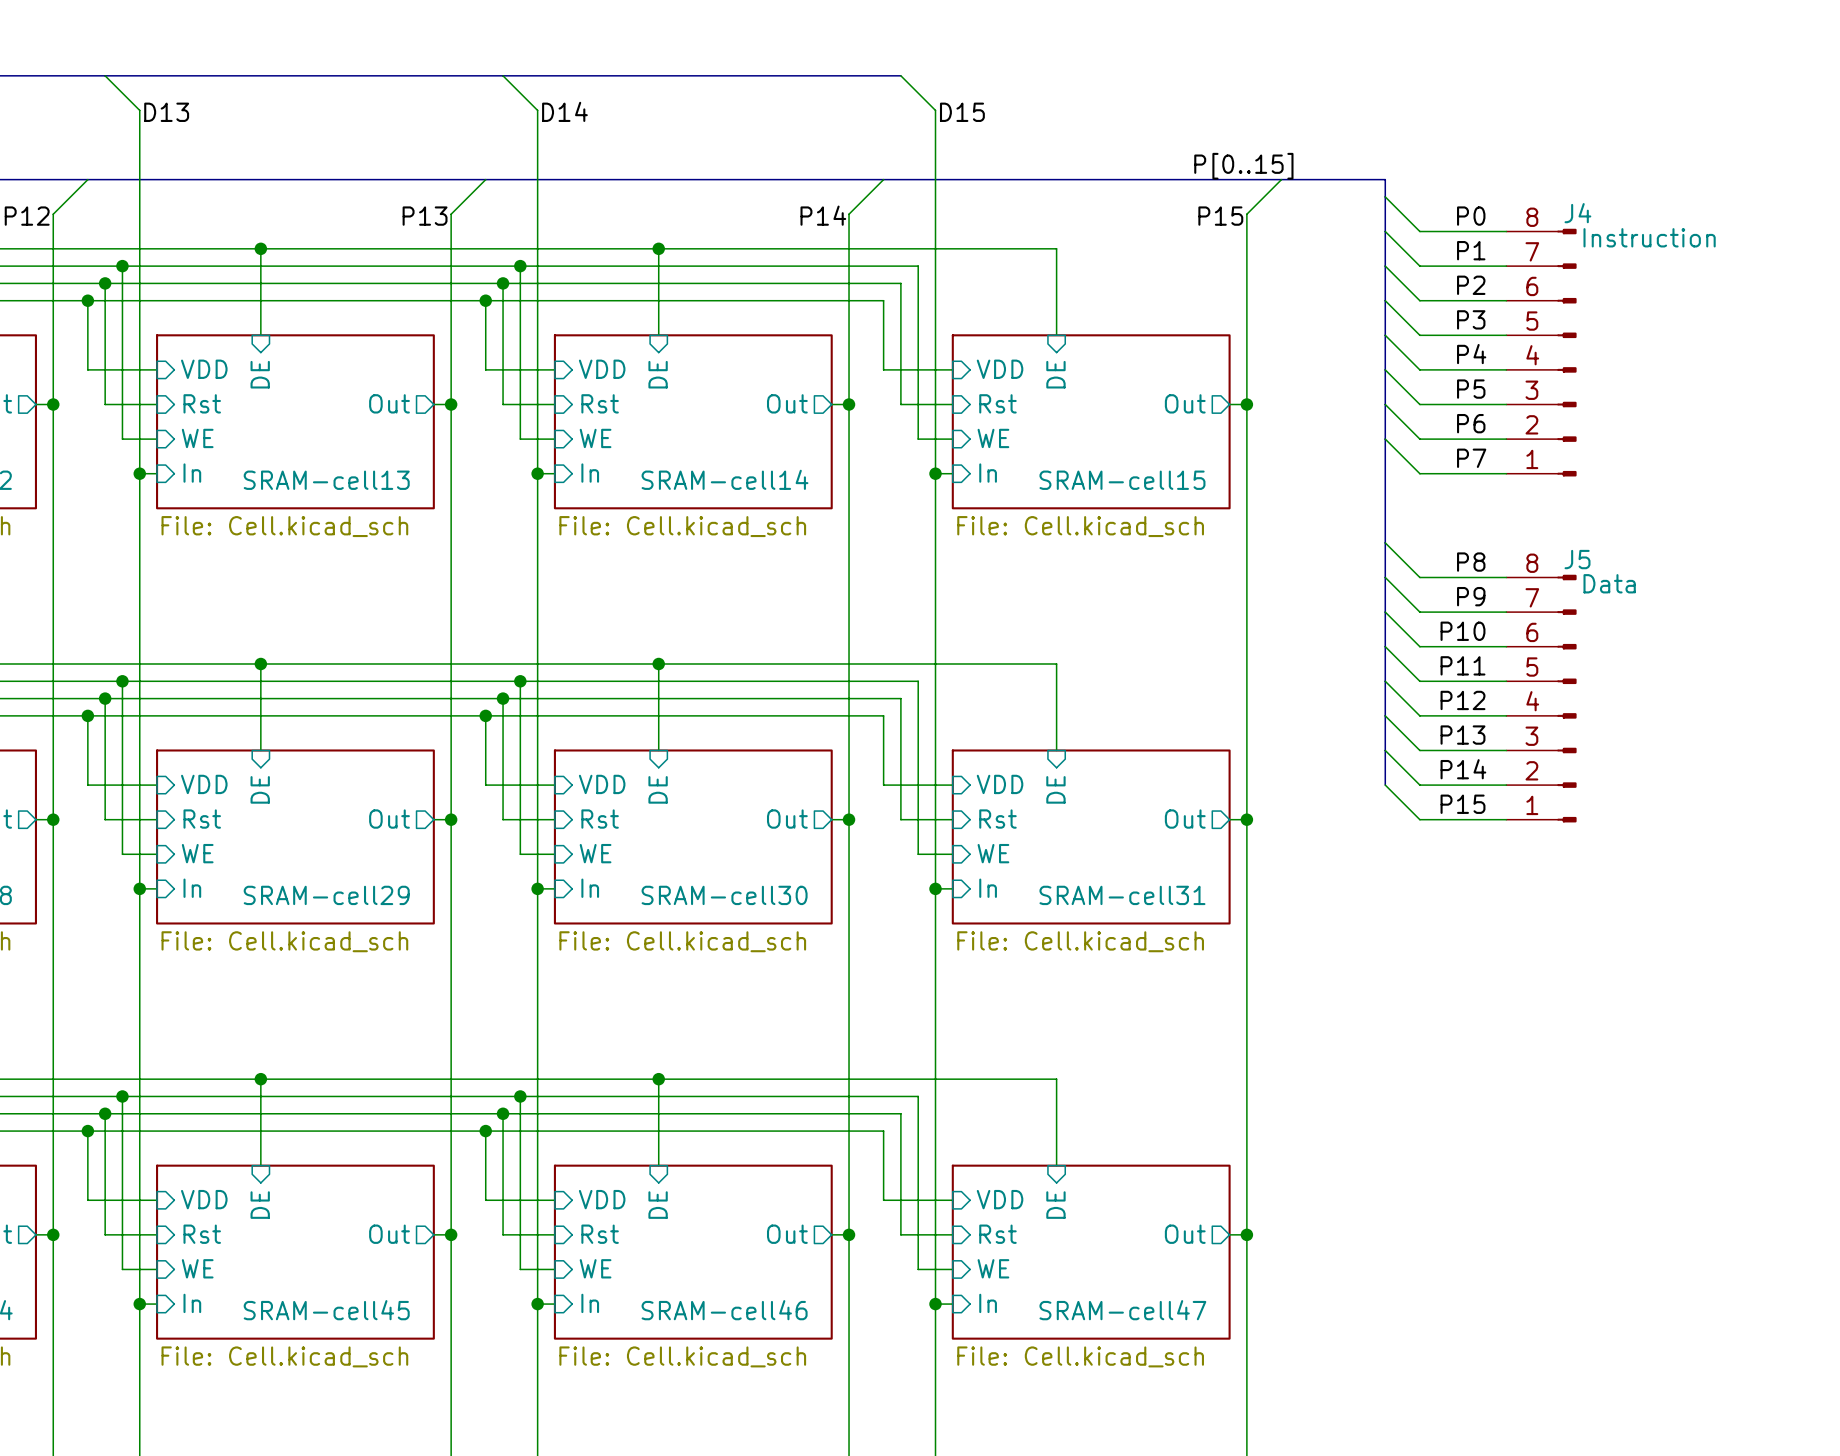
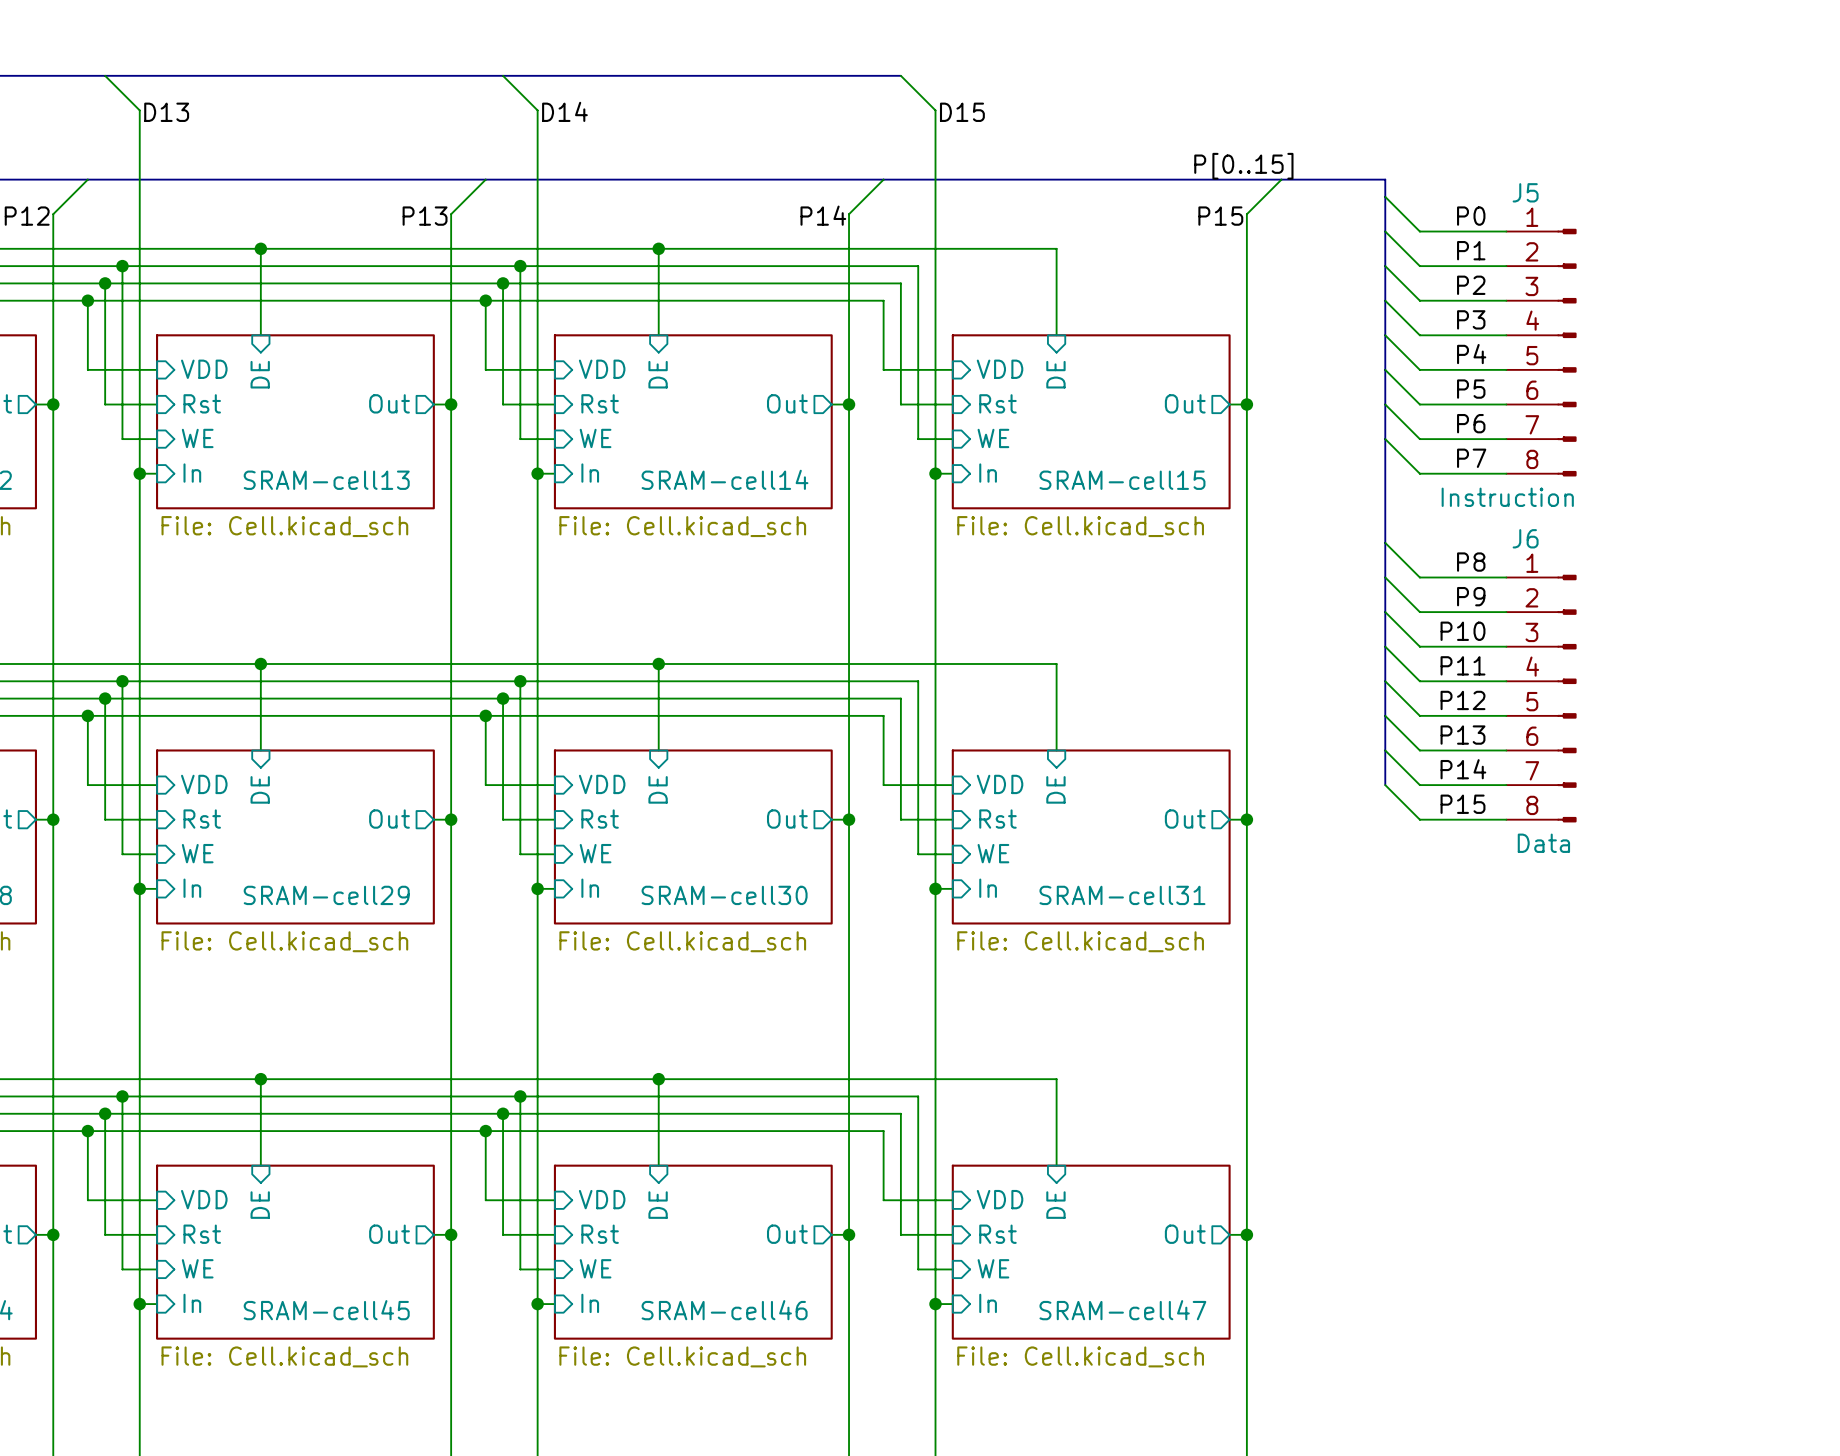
J4: Instruction (1541, 352) -> none
J5 name position: J5 (1577, 559) -> J5 (1525, 192)
J5 value: Data (1609, 583) -> Instruction (1507, 497)
J5 position: (1541, 698) -> (1541, 352)
J6: none -> Data (1541, 698)
J5 flip: as is (1566, 698) -> up-down (1566, 352)

